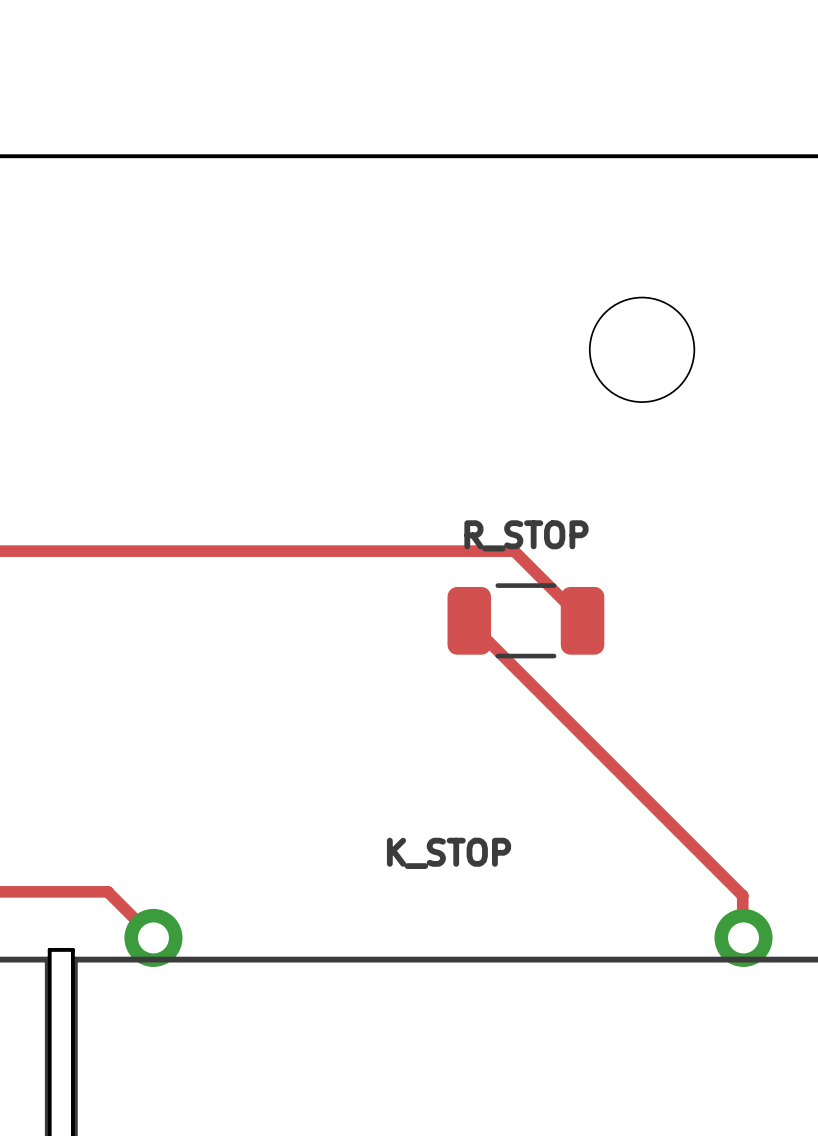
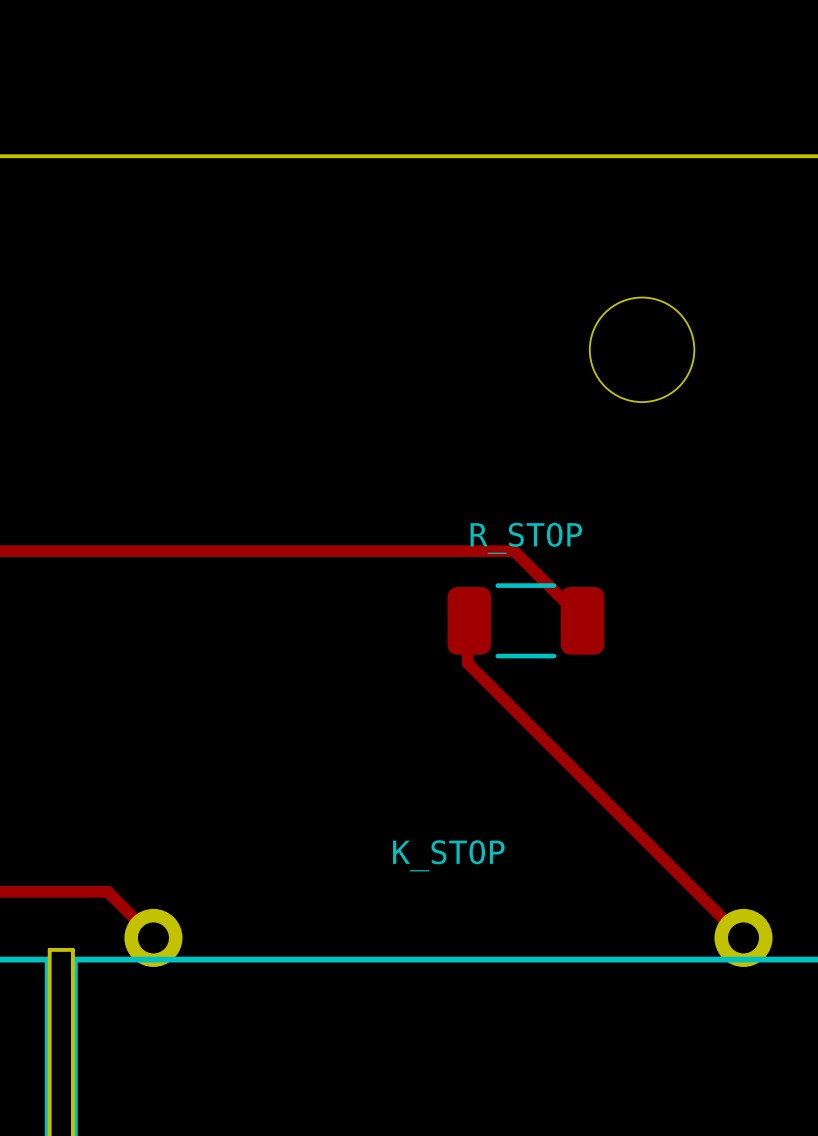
track: (467, 620) (742, 895) (742, 938) -> (467, 620) (467, 663) (742, 938)

